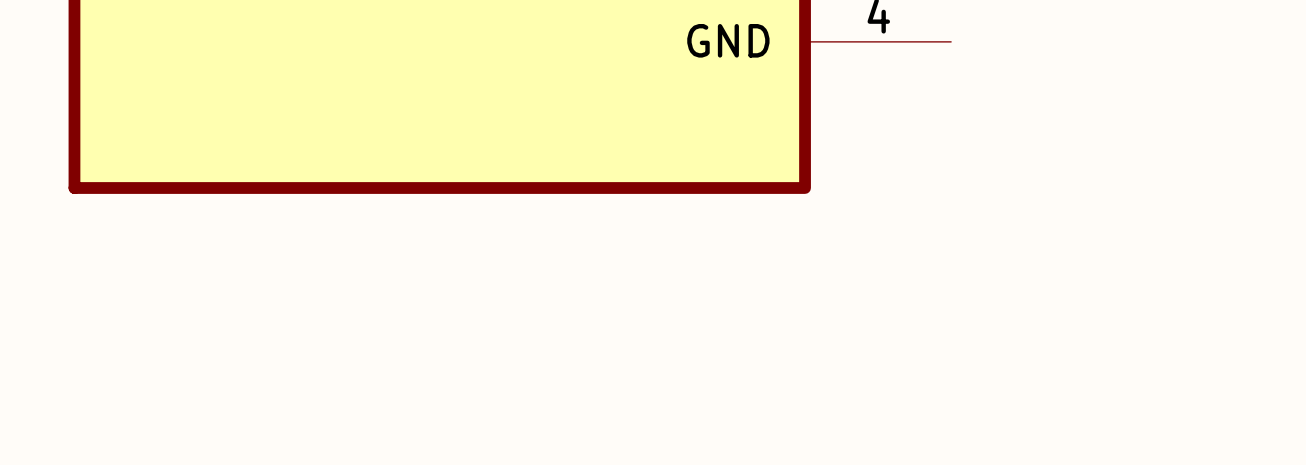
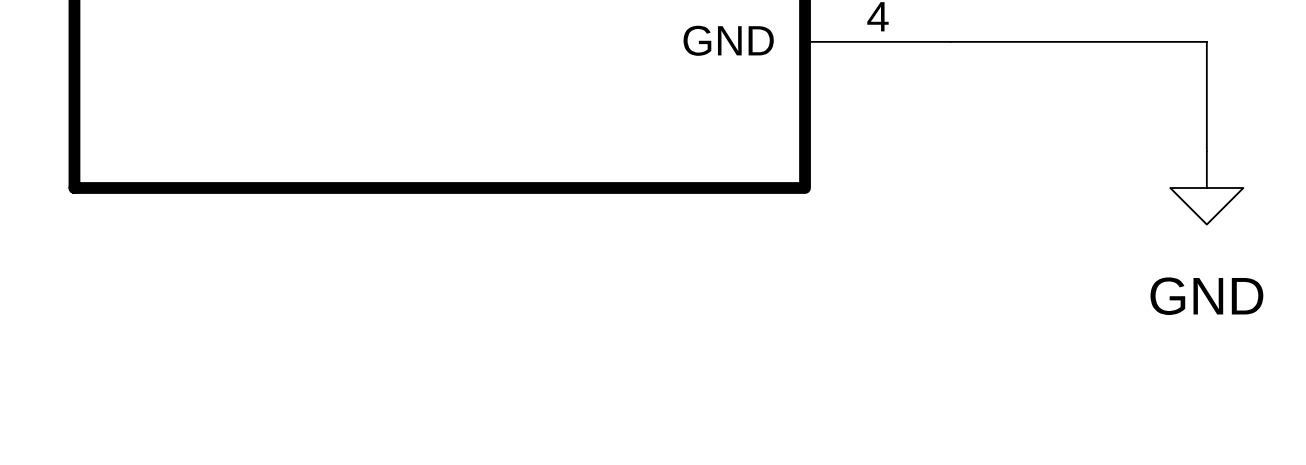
wire: none -> (951, 41) (1206, 41) (1206, 151)
power symbol: none -> GND (1206, 188)

